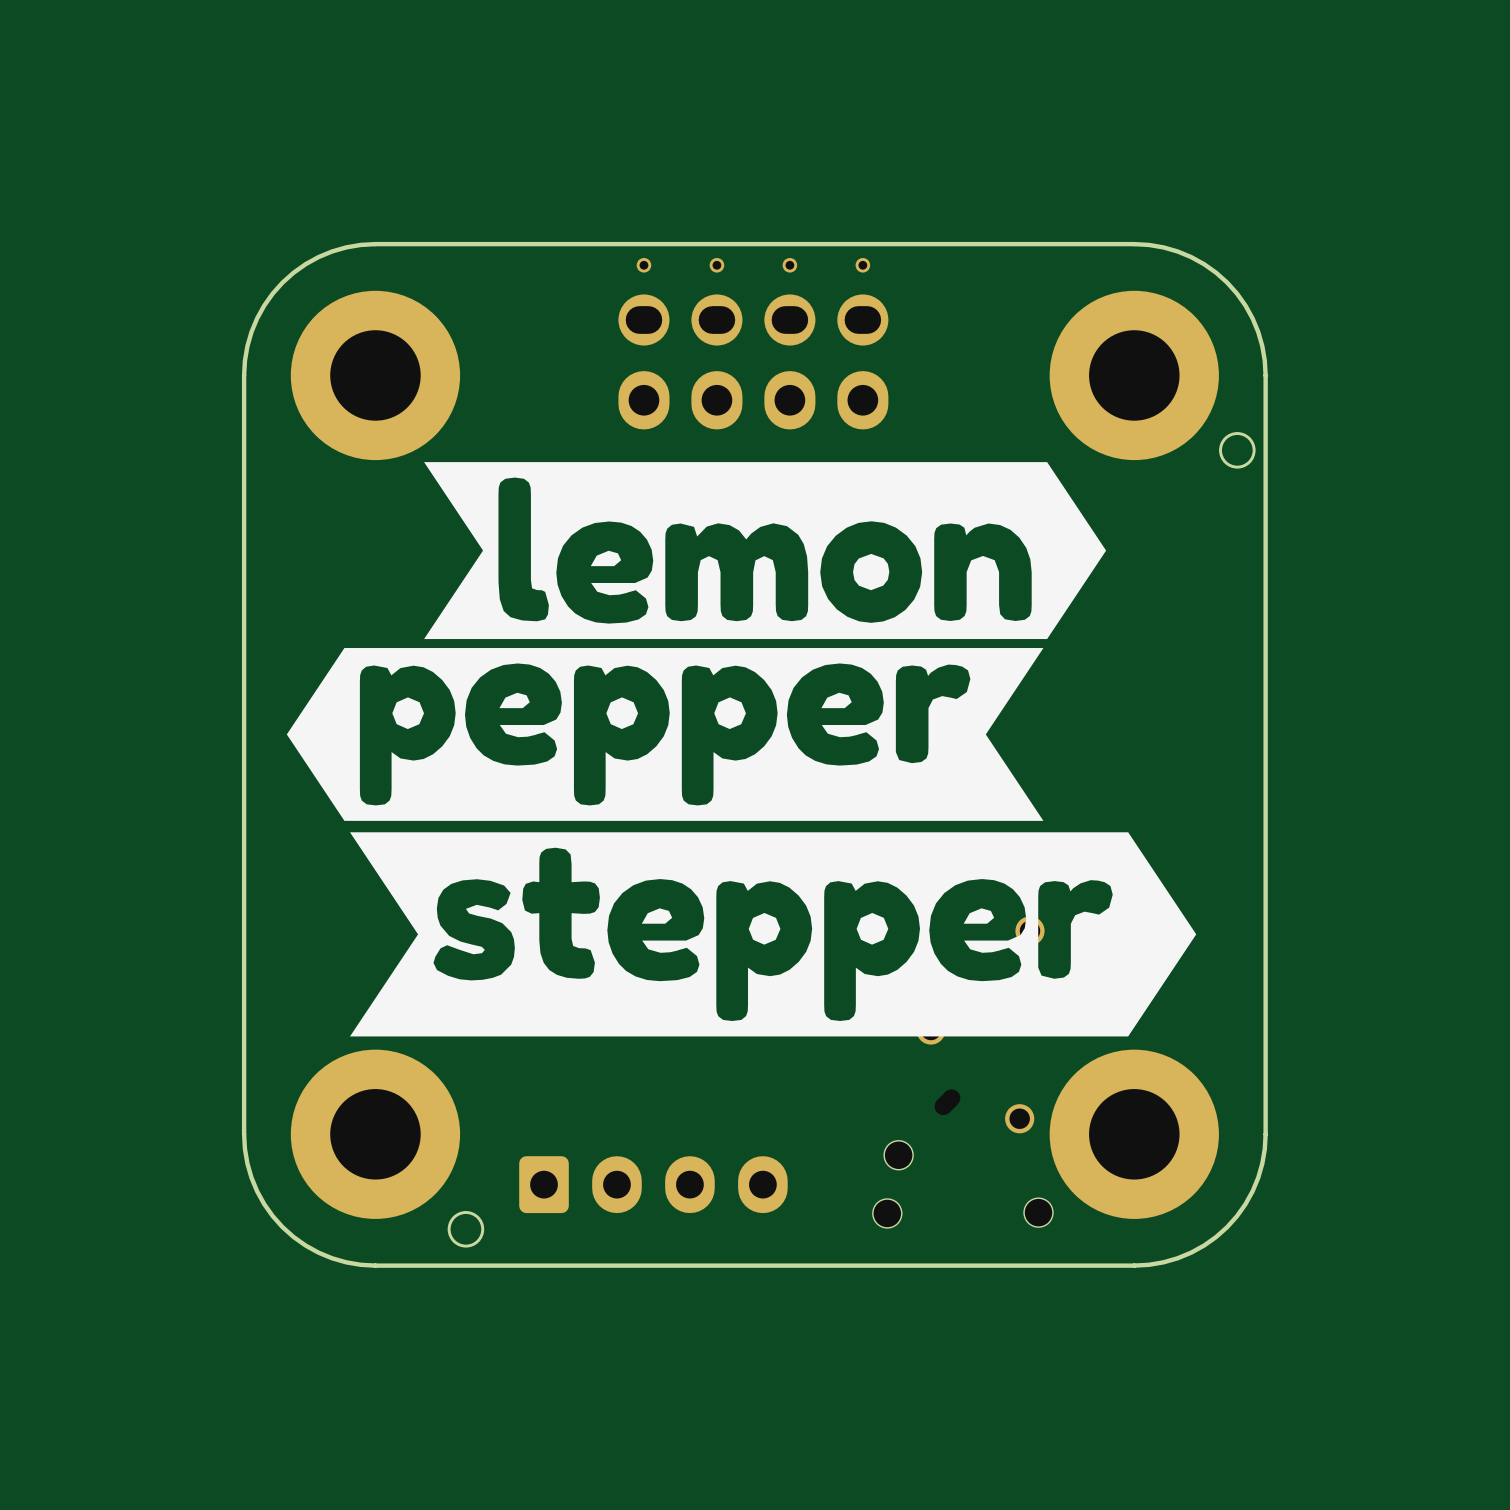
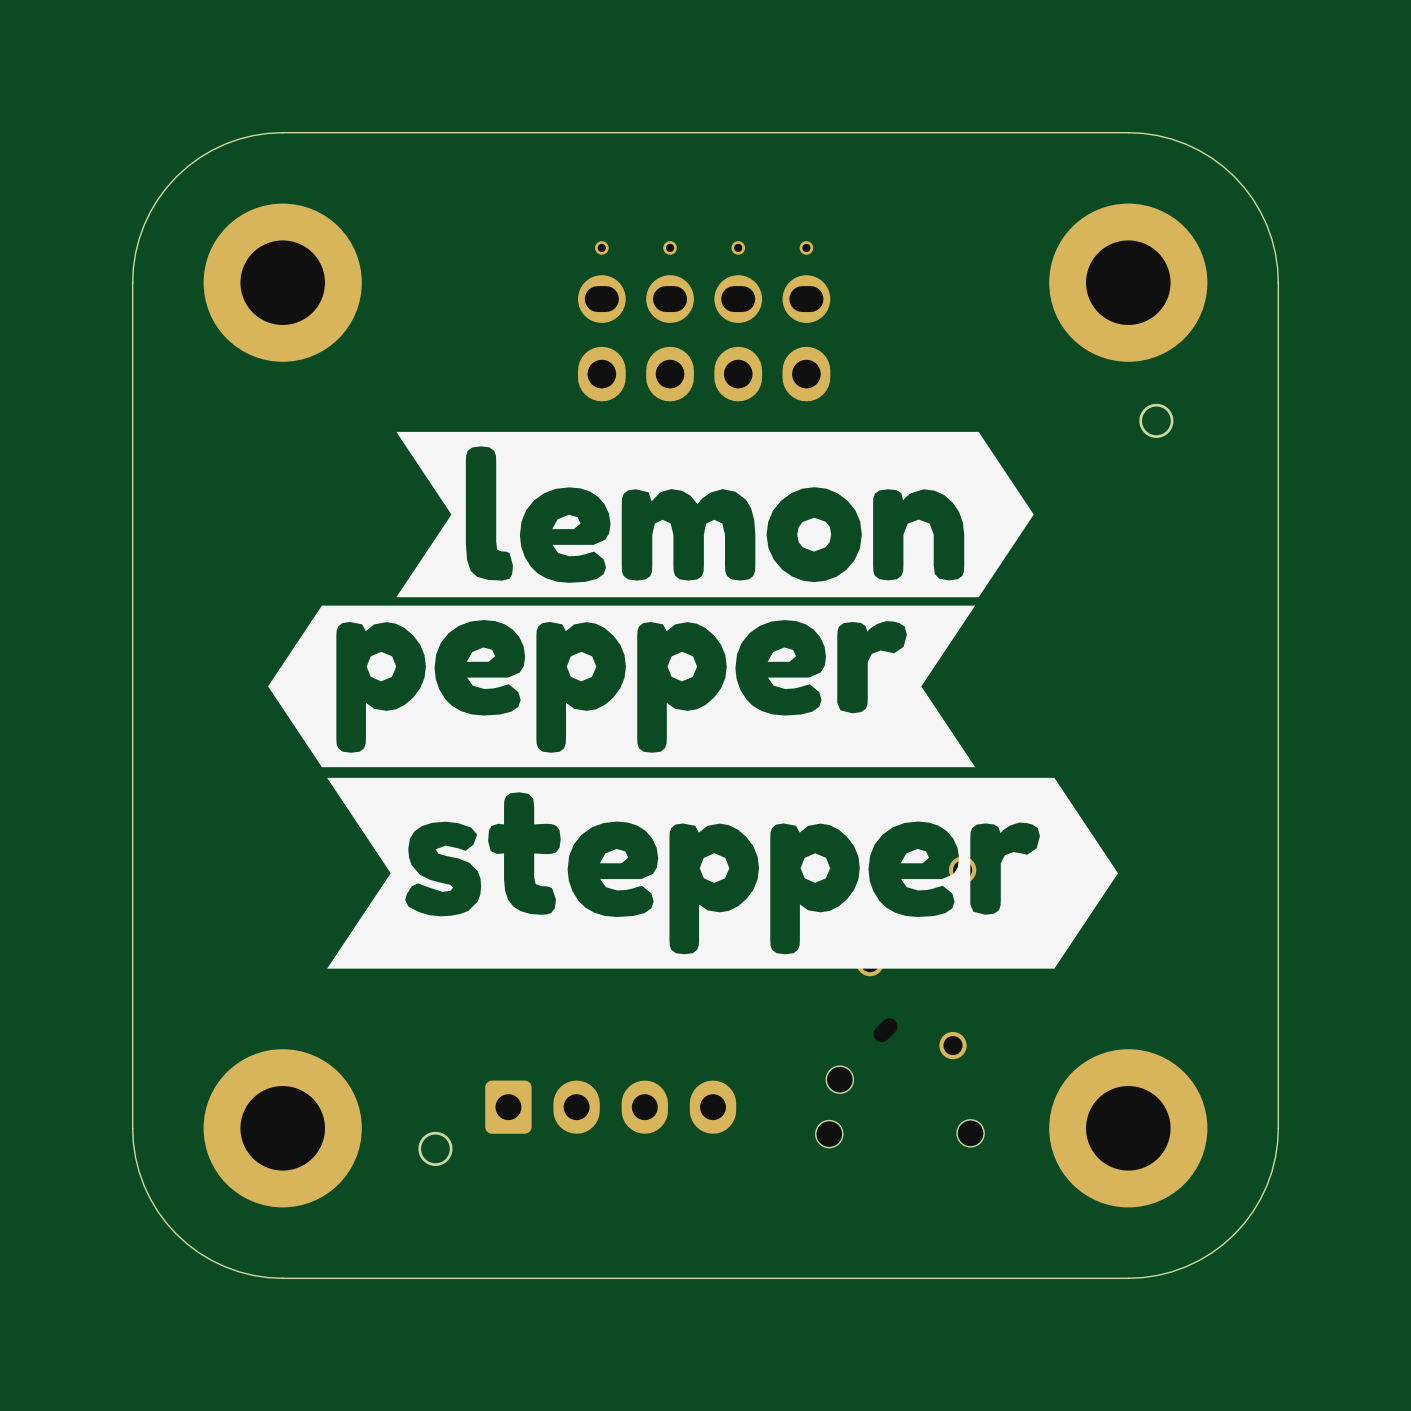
part footprint: [241, 241, 1268, 1268] -> [132, 132, 1279, 1279]

